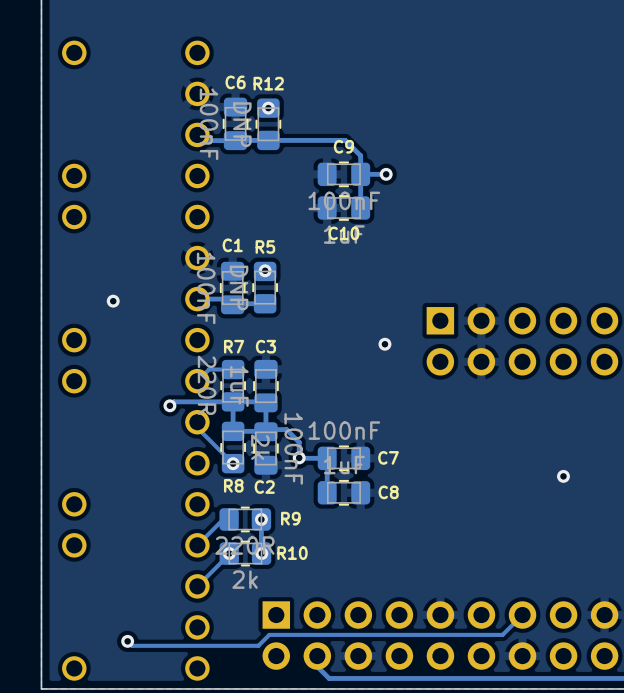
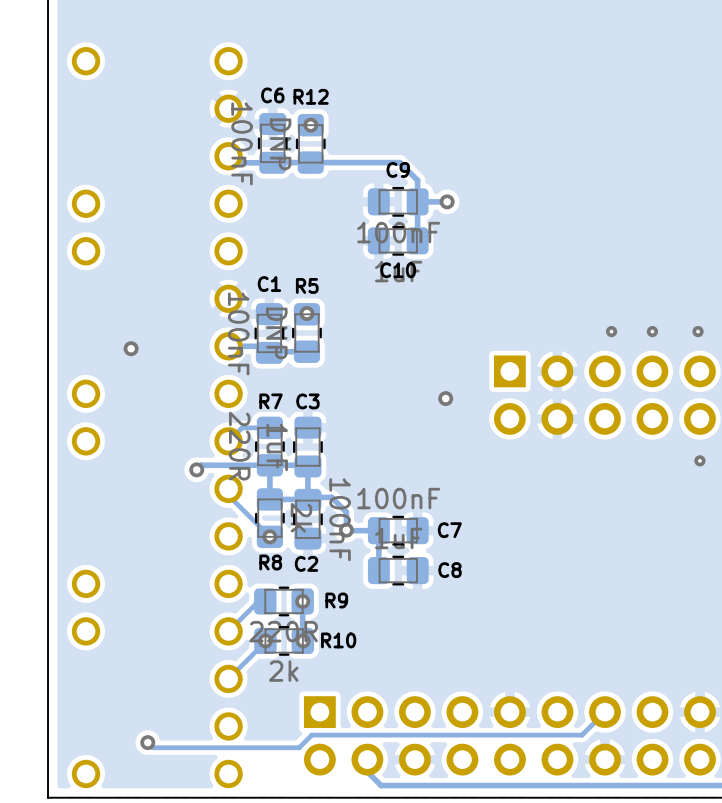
via: none -> (611, 331)
via: none -> (652, 331)
via: none -> (698, 331)
via: none -> (699, 460)
via: (563, 476) -> none

